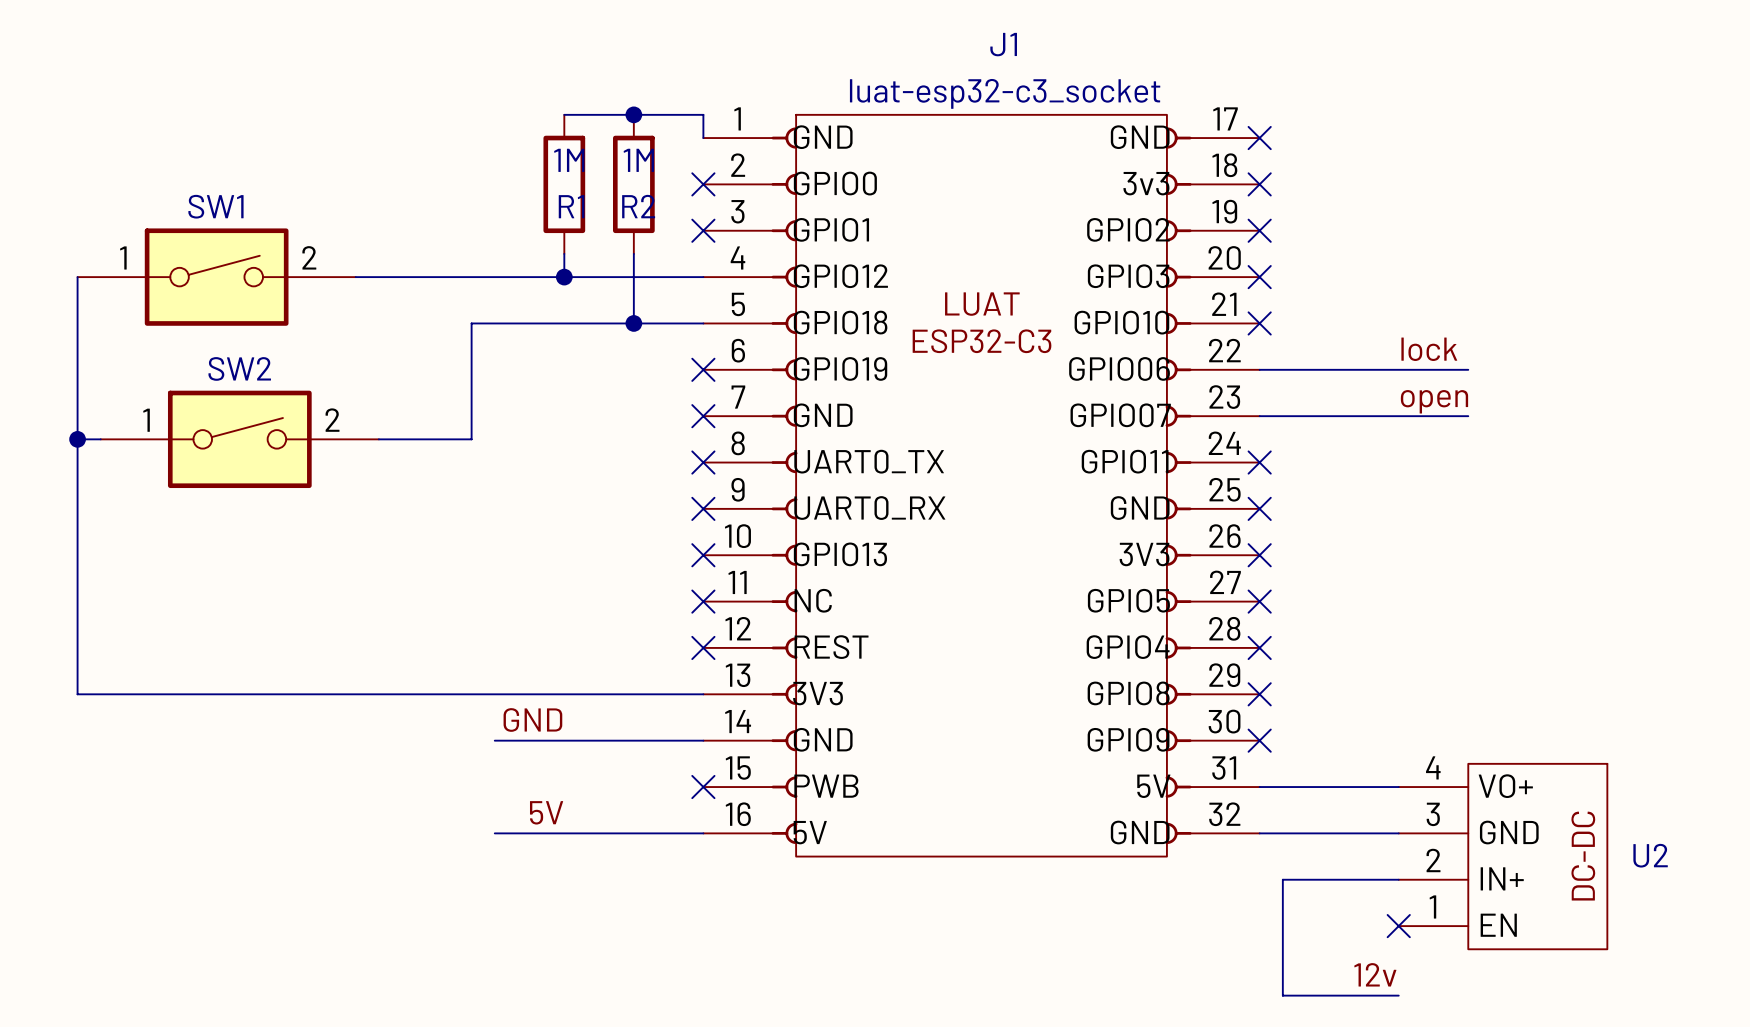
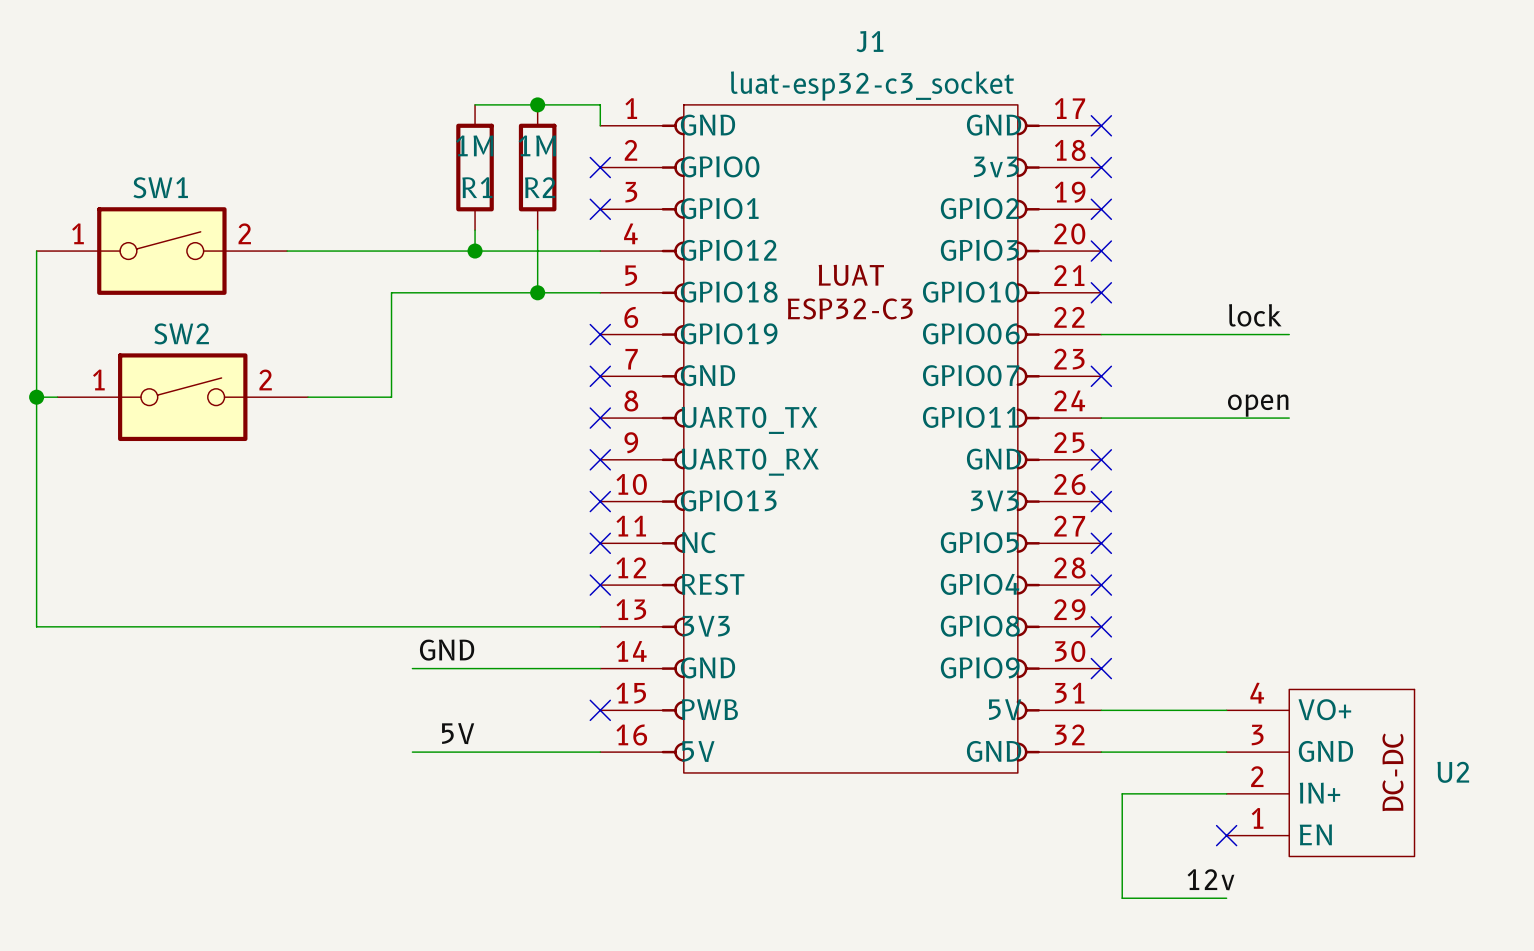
label position: open (1434, 401) -> open (1258, 405)
wire: (1259, 416) (1468, 416) -> (1101, 418) (1289, 418)
no-connect mark position: (1259, 462) -> (1101, 376)

